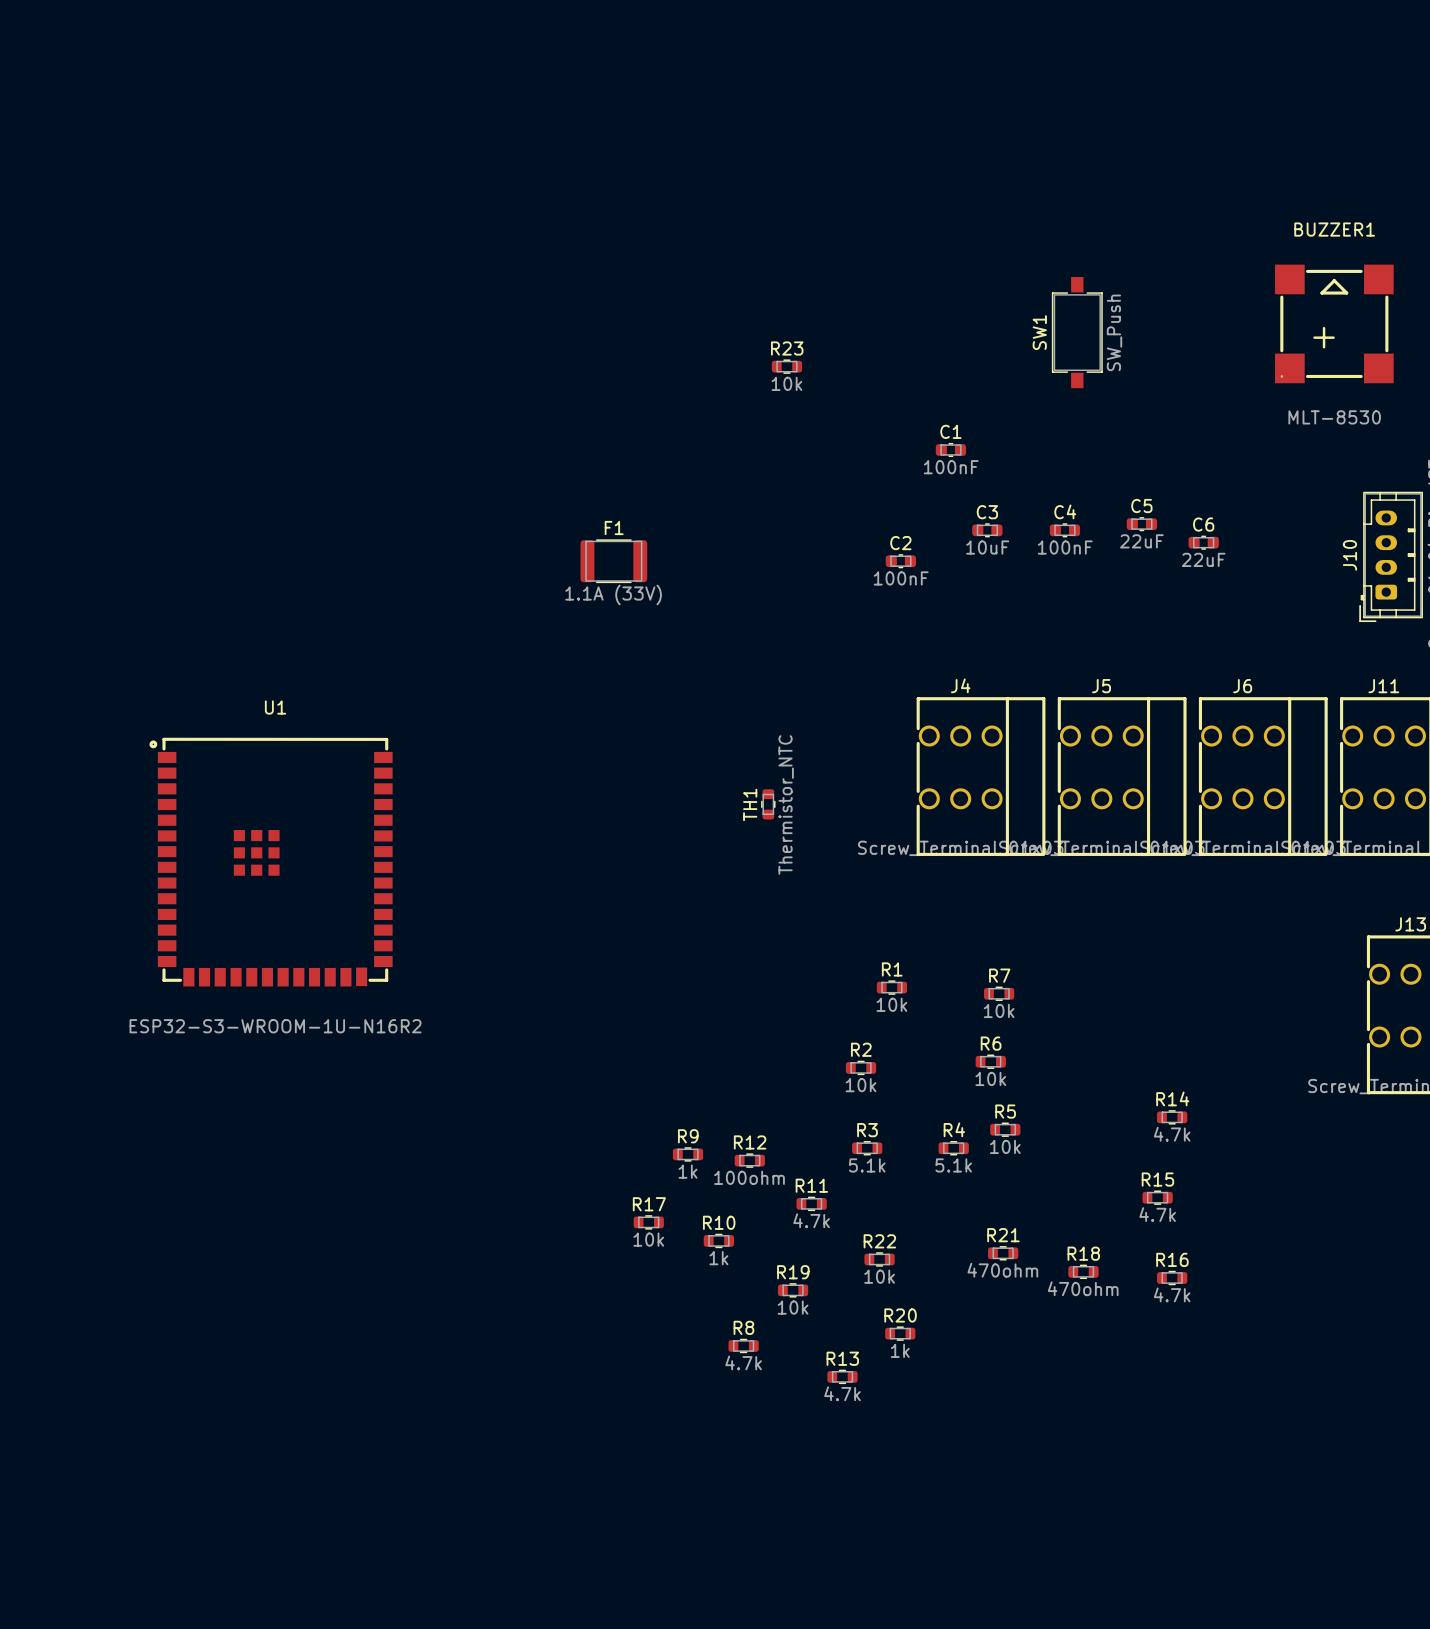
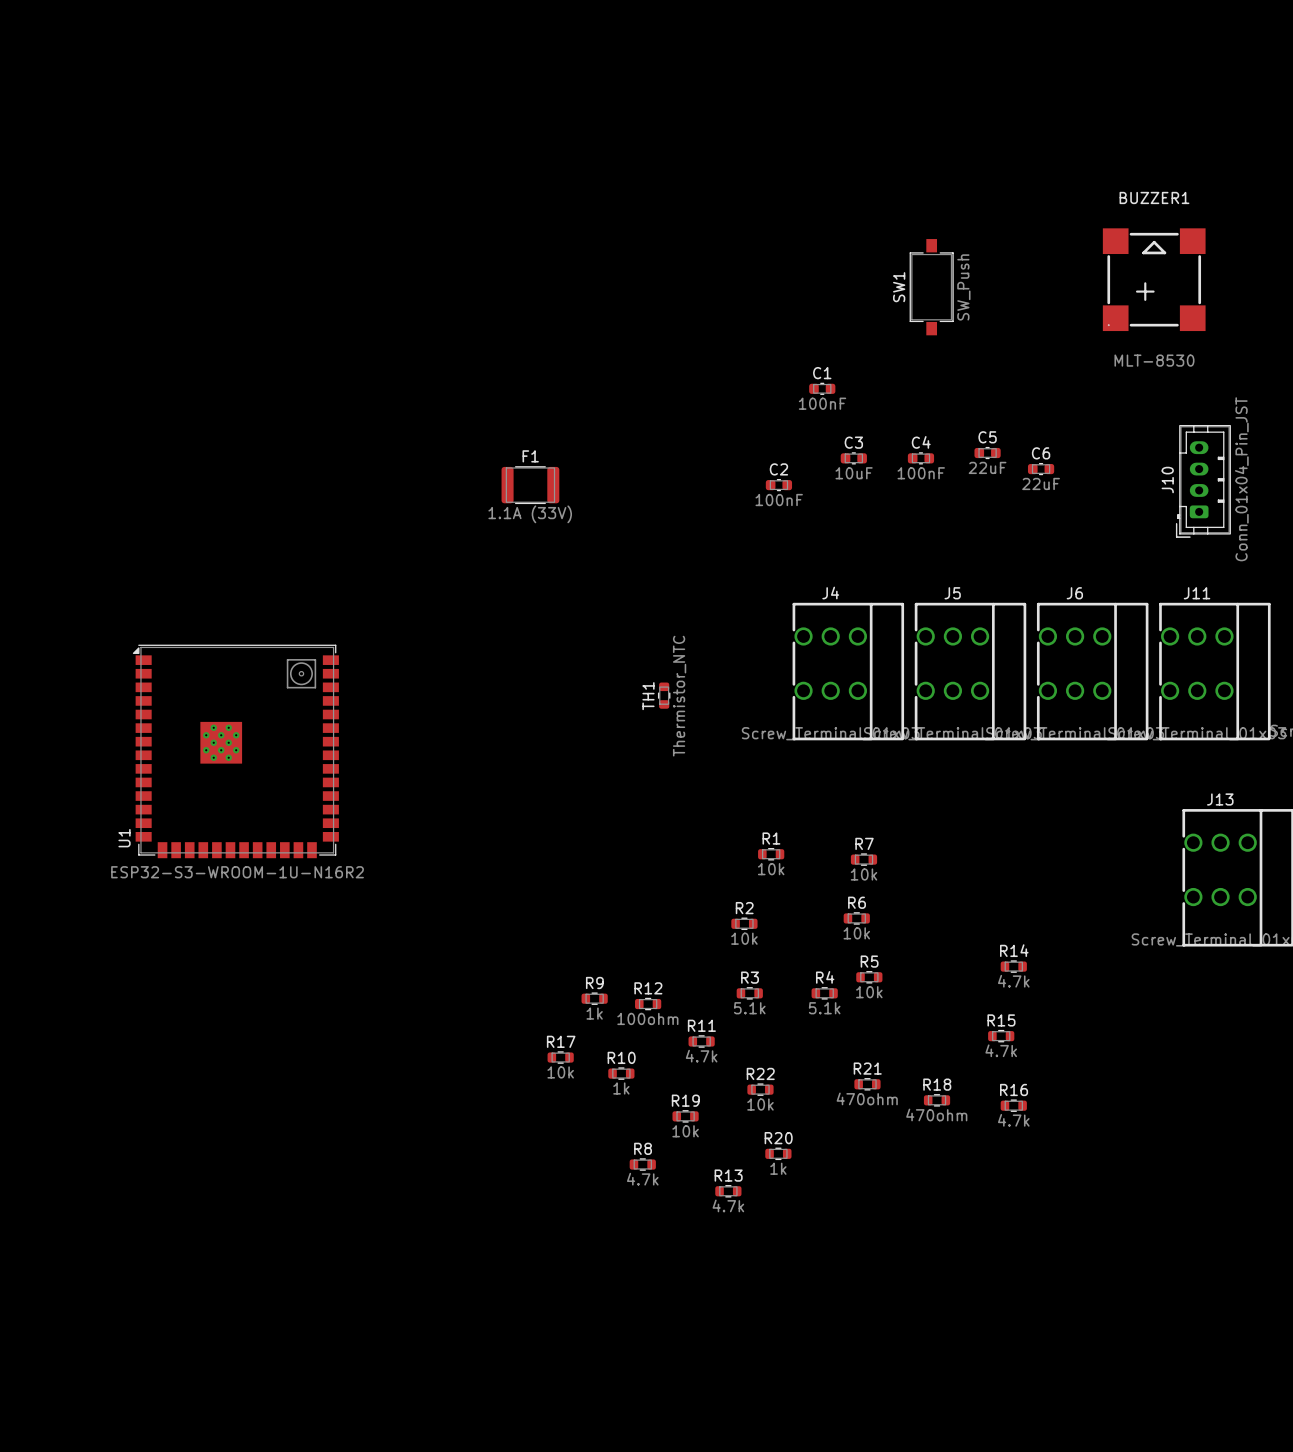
R23: 10k (786, 366) -> none
U1 name position: U1 (275, 707) -> U1 (124, 838)
U1 footprint: [149, 737, 393, 987] -> [132, 644, 339, 859]

